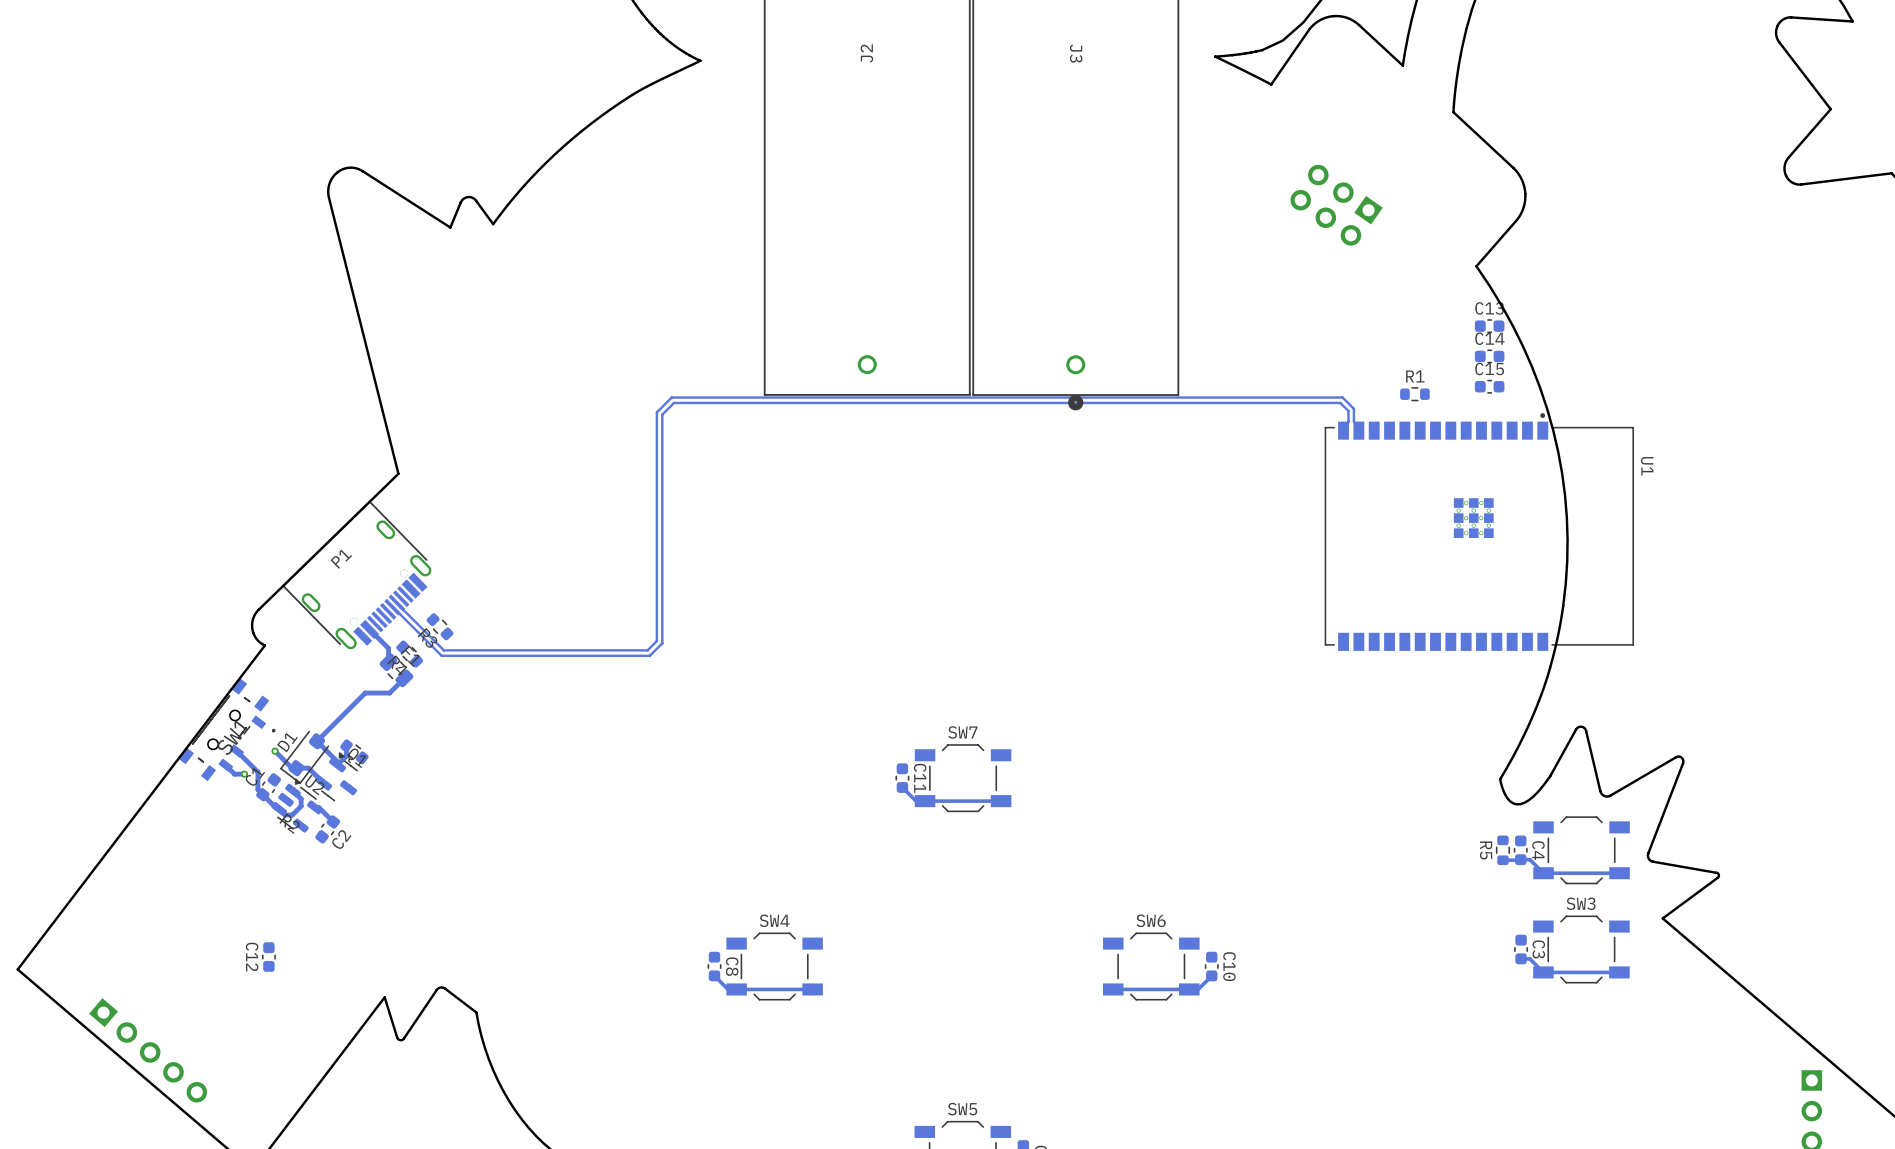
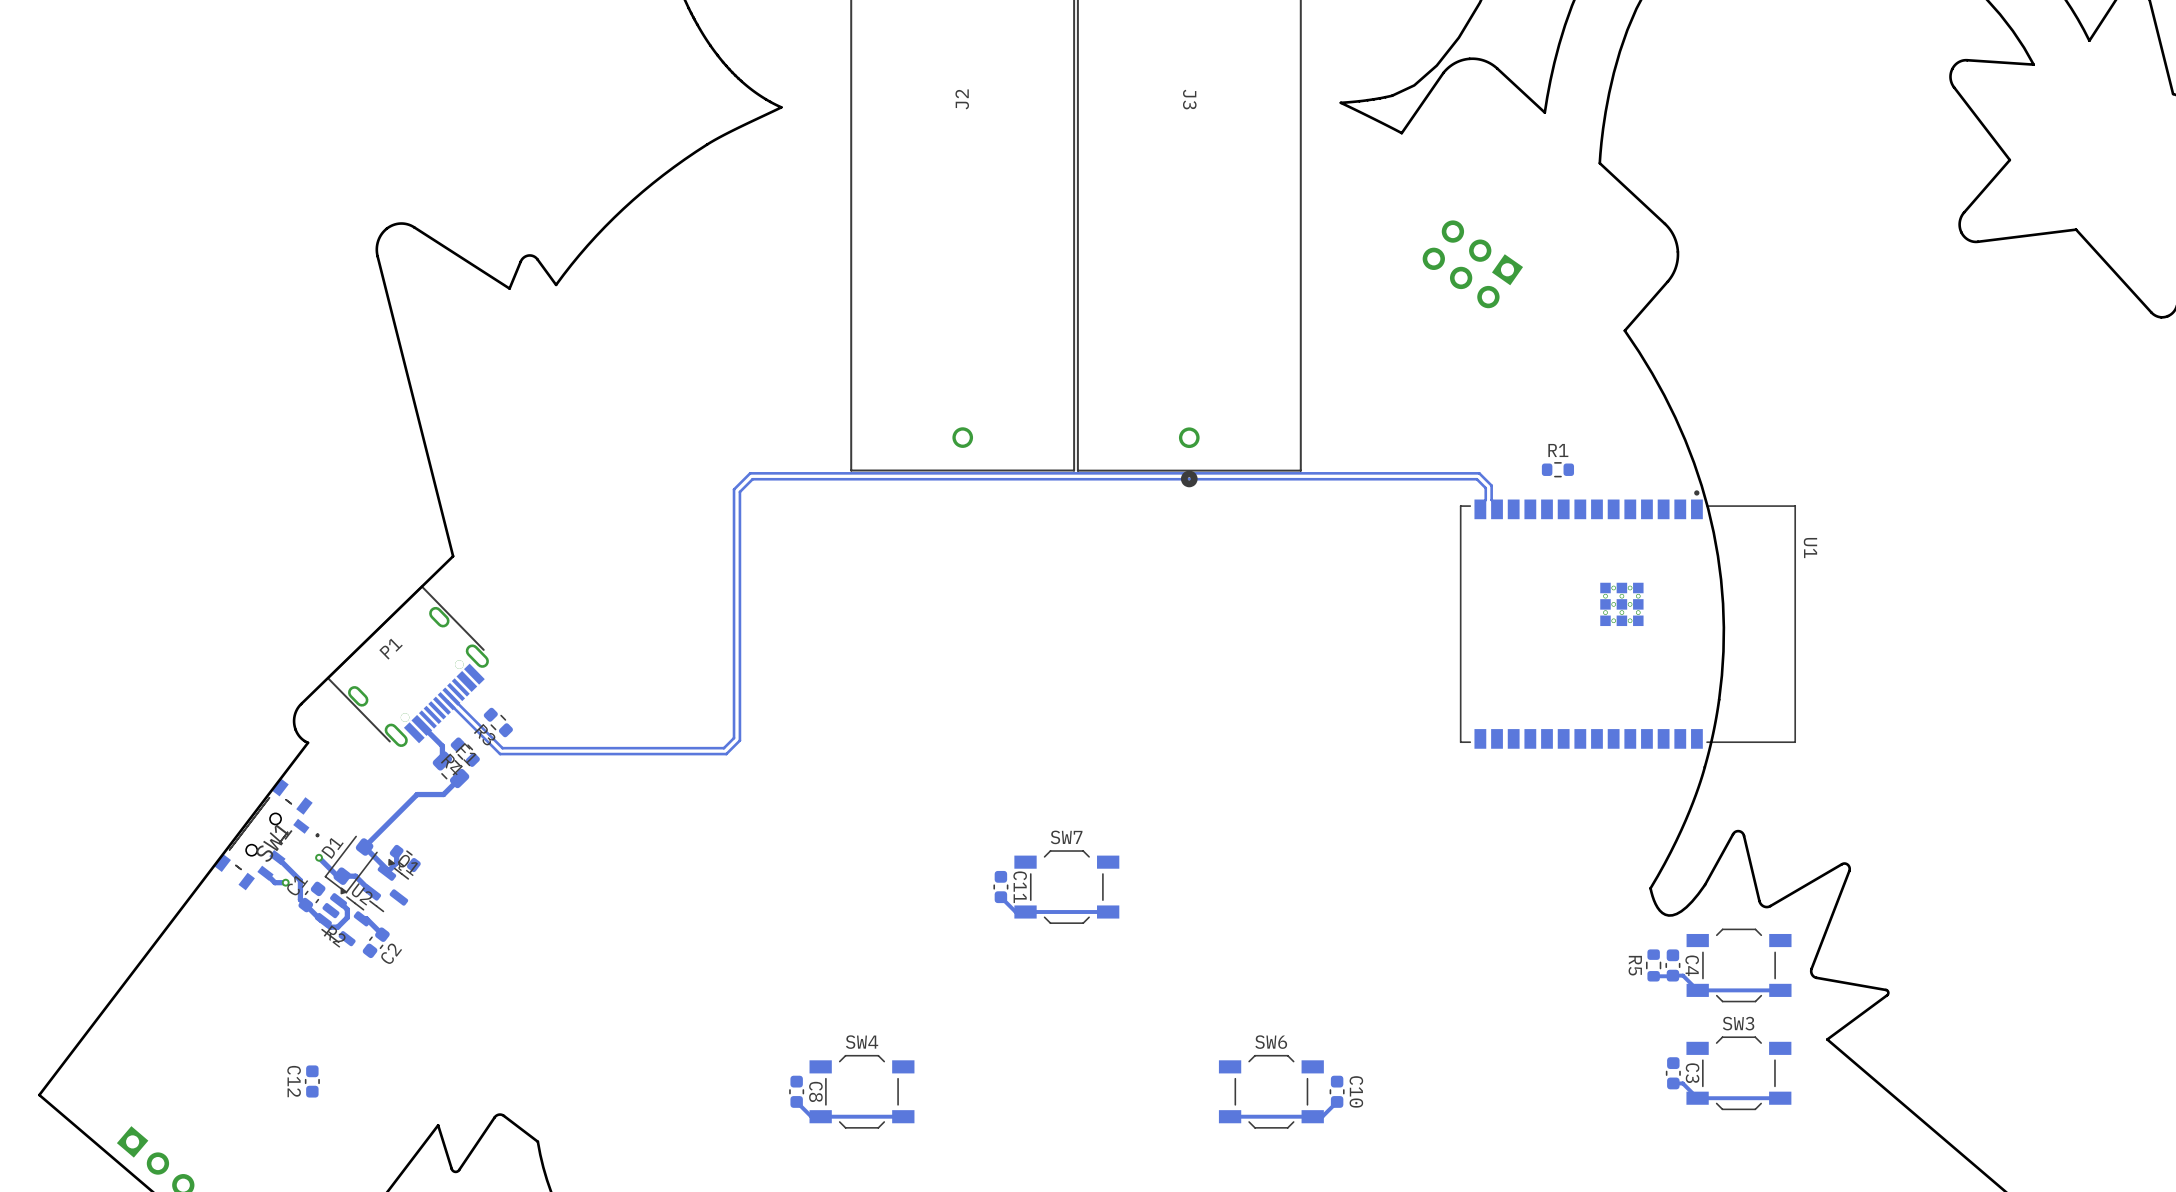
C13: (1489, 326) -> none
C14: (1489, 356) -> none
C15: (1489, 386) -> none

